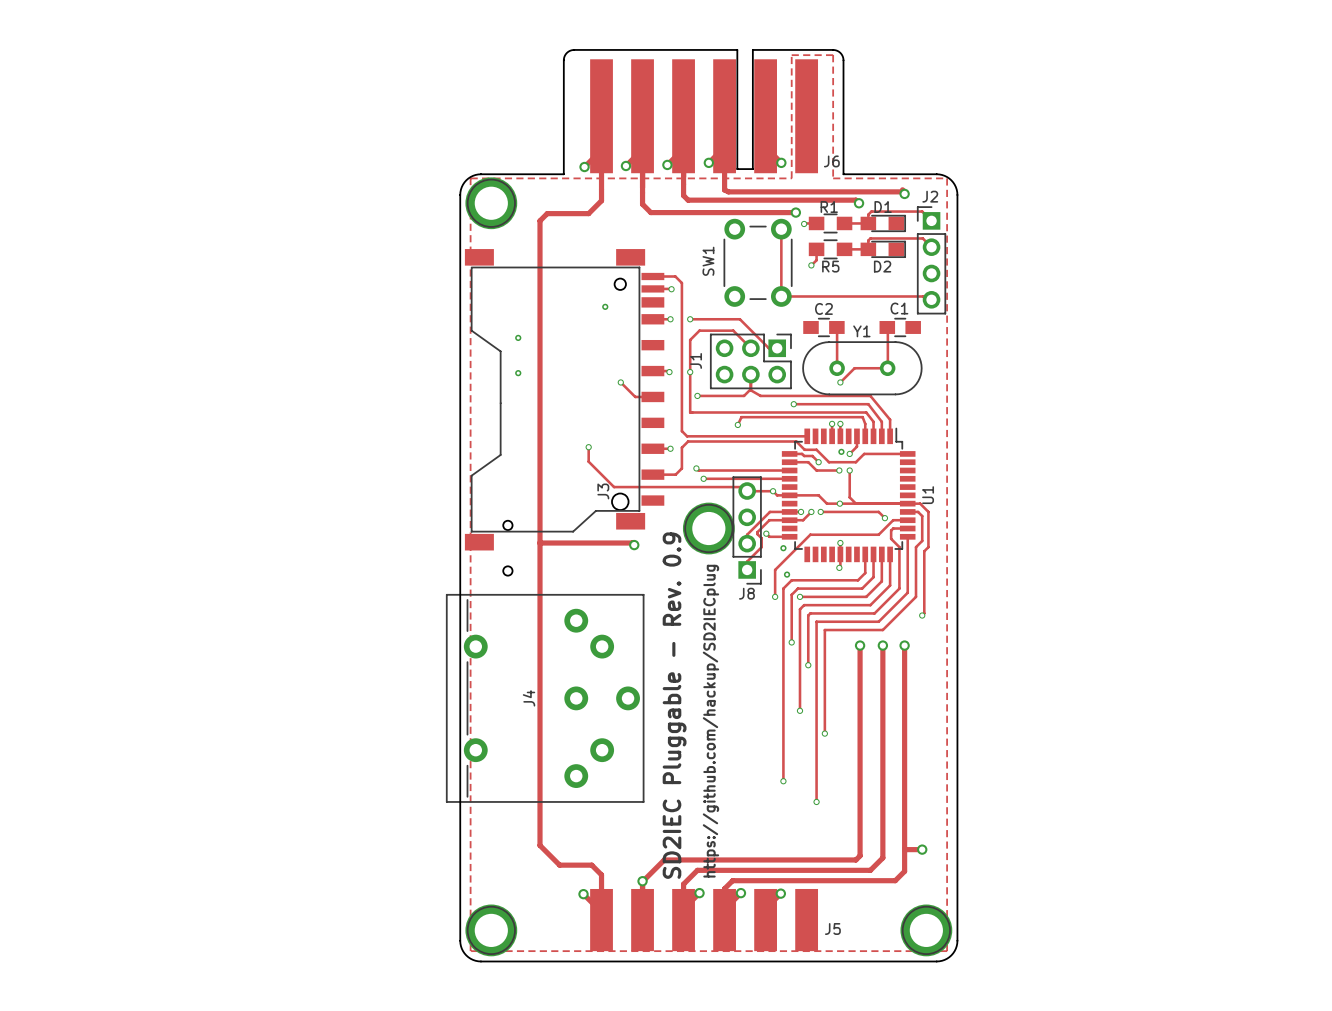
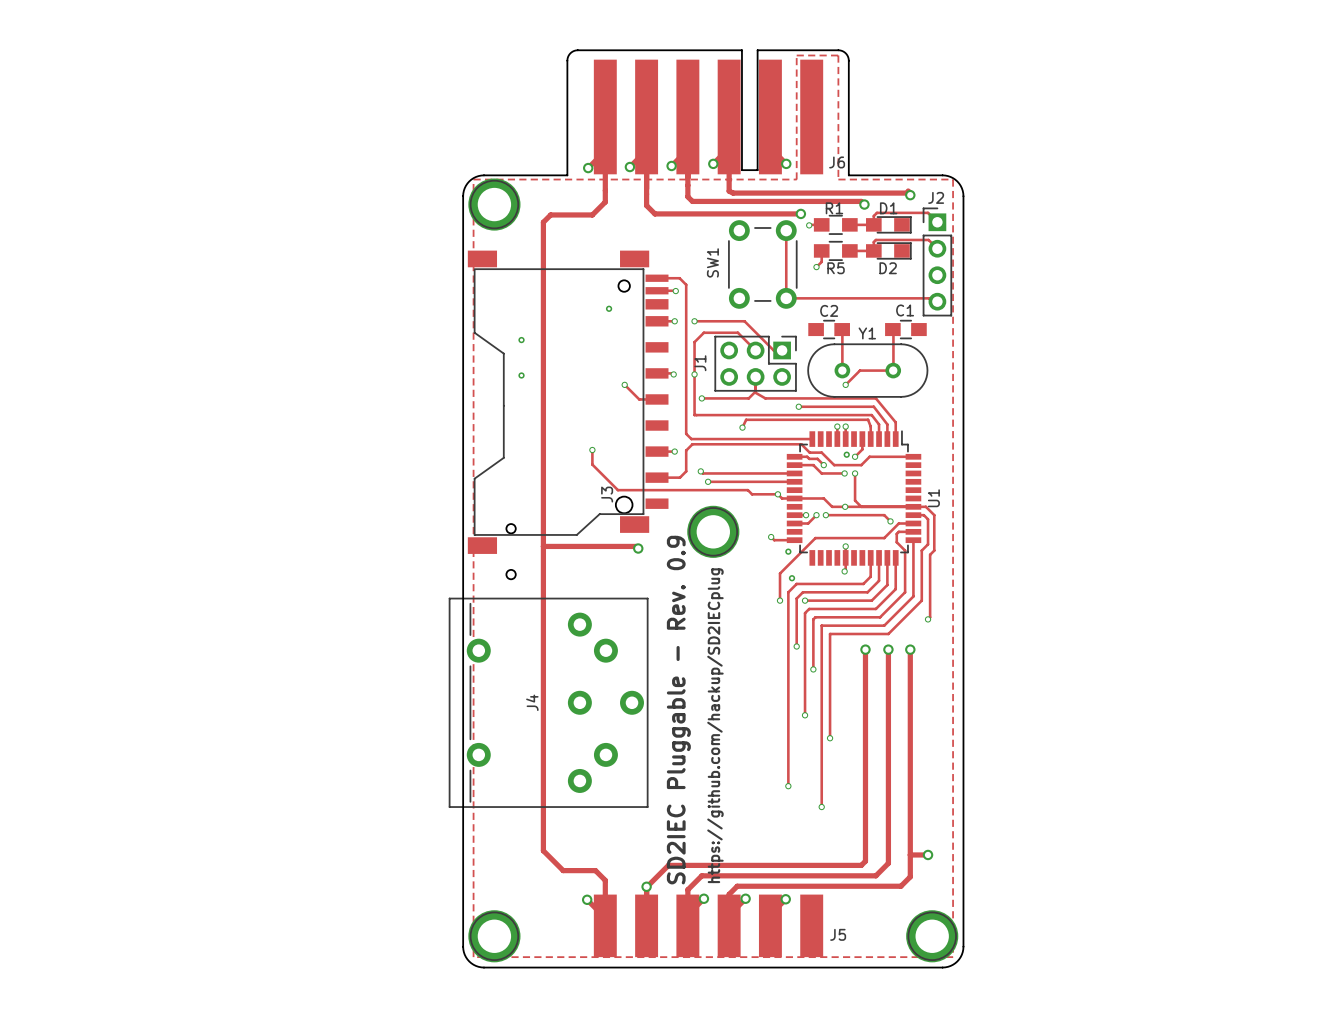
track: (789, 511) (769, 511) (747, 534) (747, 543) -> none
track: (789, 520) (769, 520) (757, 532) (761, 538) (761, 547) (747, 561) (747, 569) -> none
J8: (747, 530) -> none

